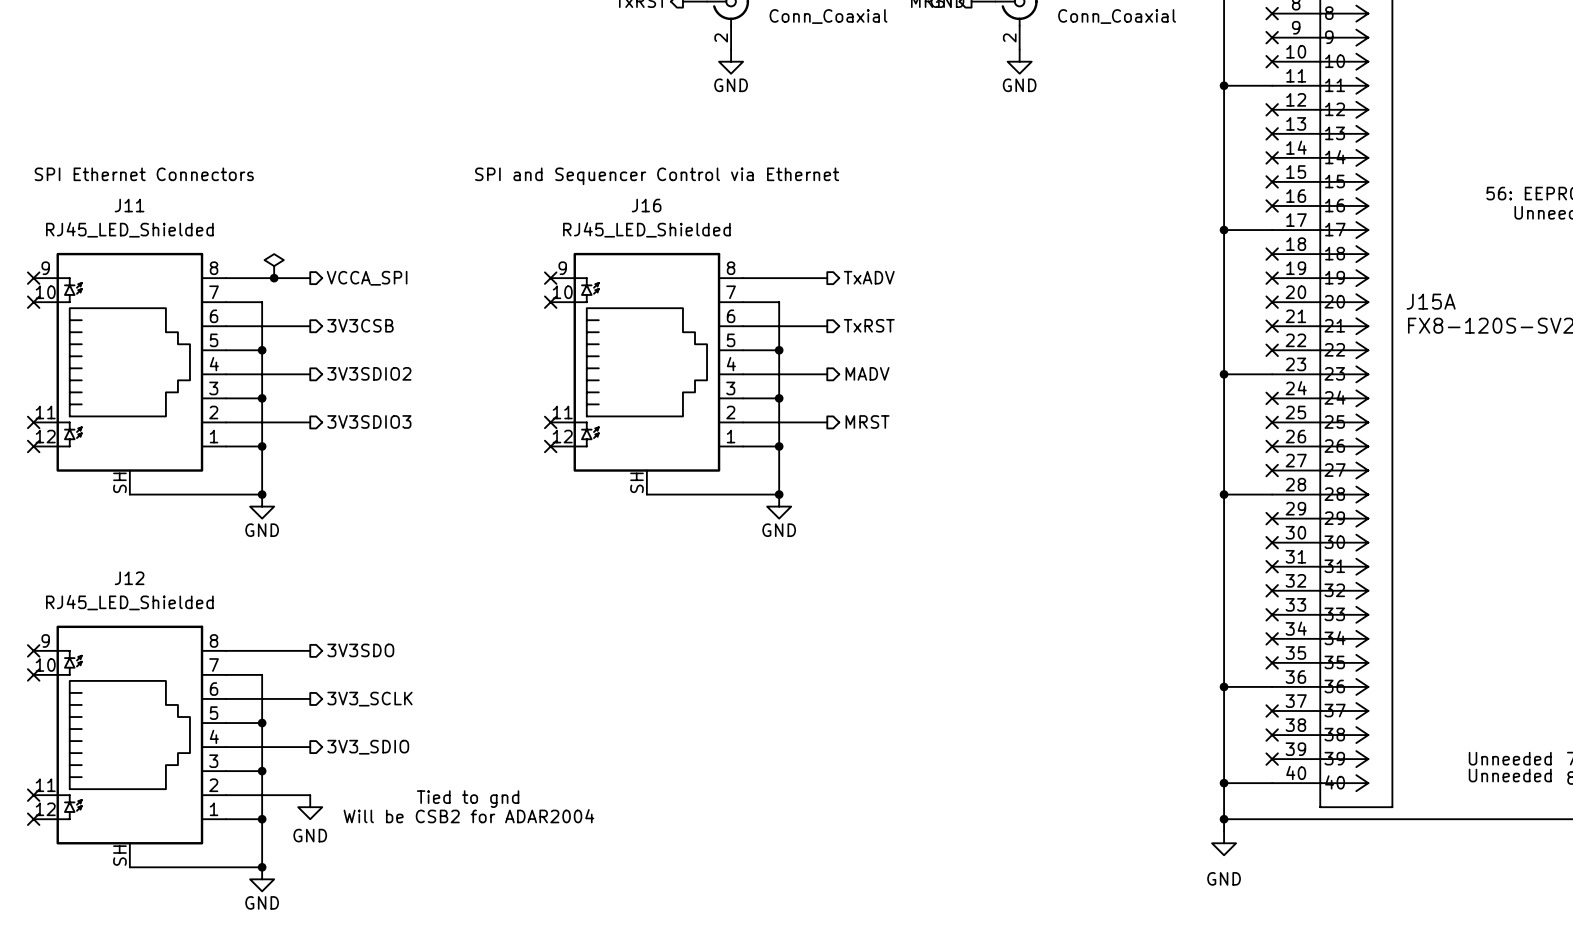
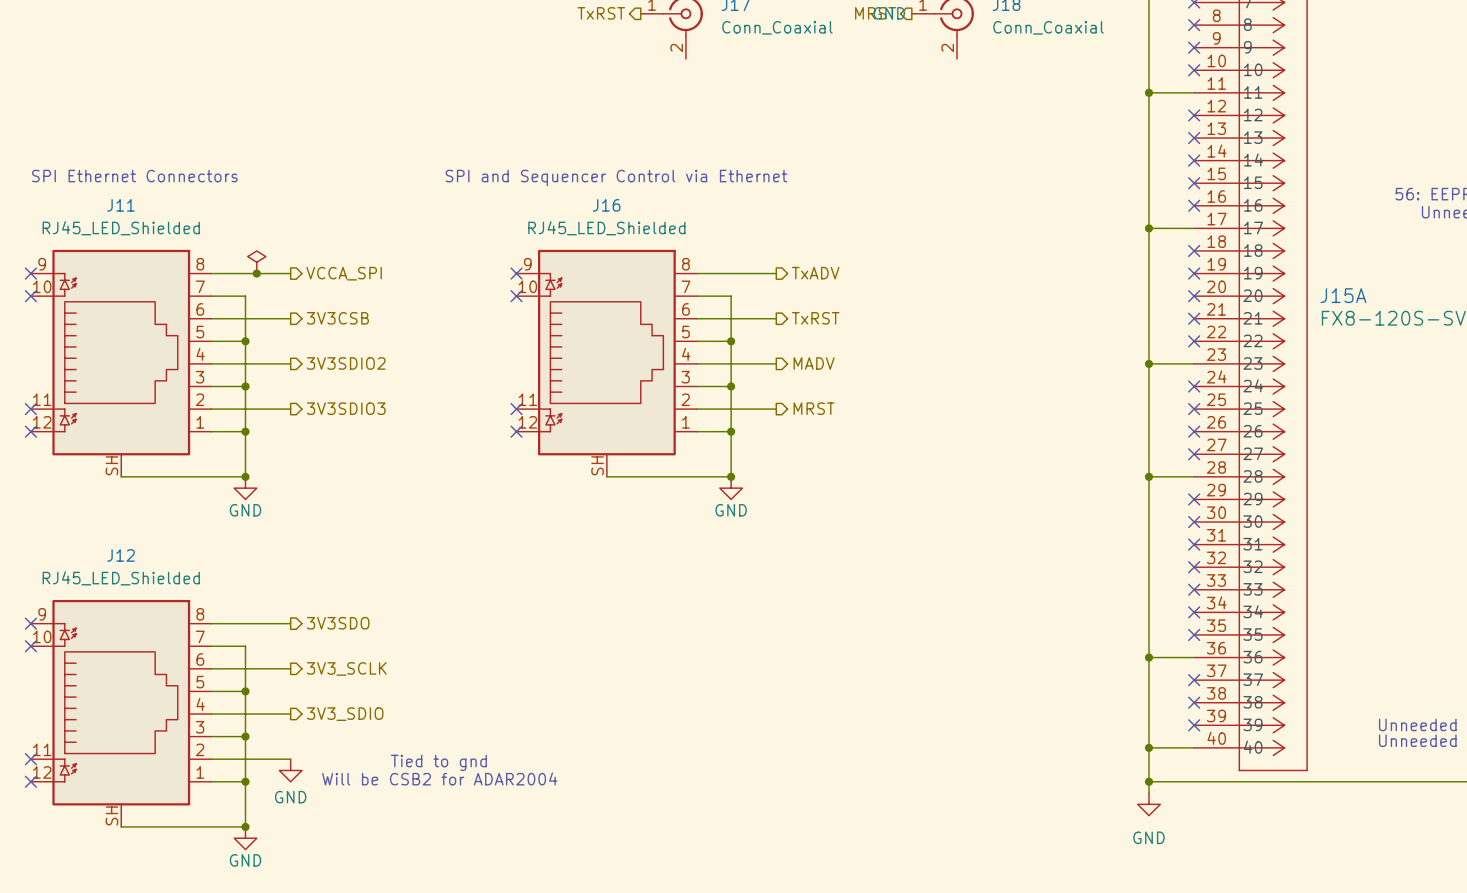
power symbol: GND (731, 61) -> none
power symbol: GND (1019, 61) -> none

